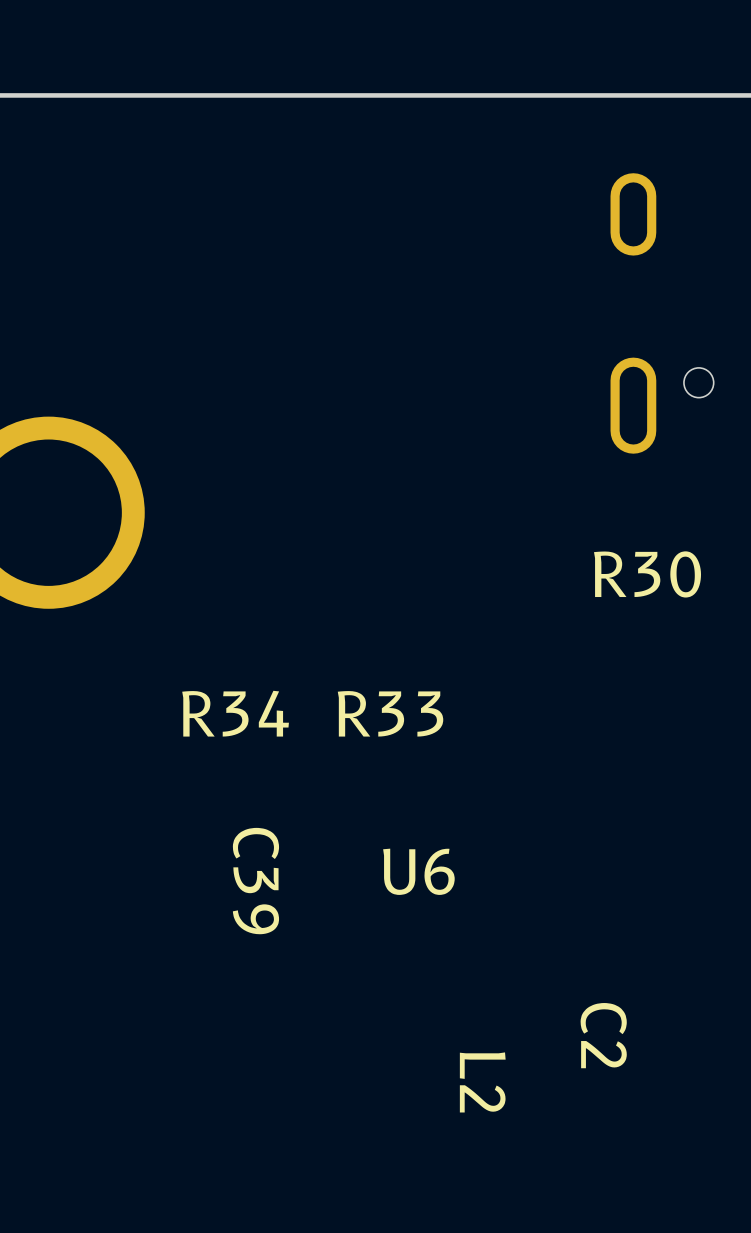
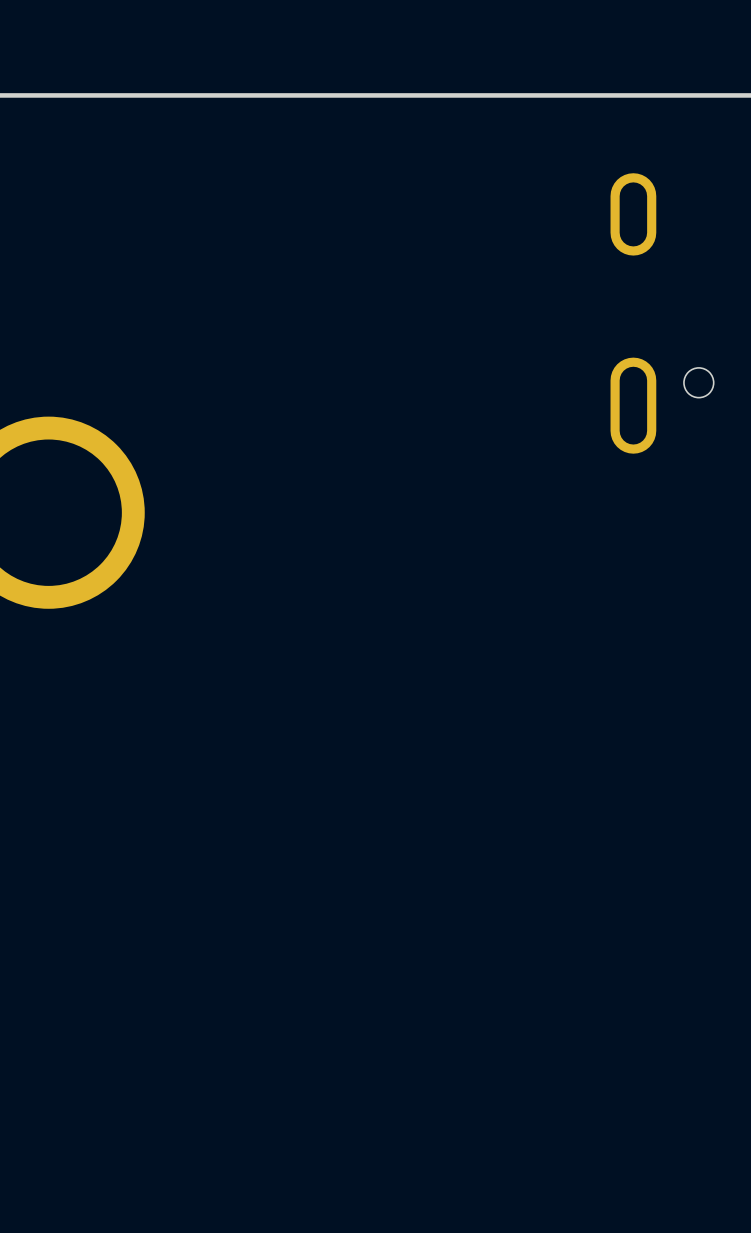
R30: (647, 574) -> none
R34: (235, 713) -> none
R33: (390, 713) -> none
U6: (418, 871) -> none
C39: (255, 881) -> none
C2: (603, 1035) -> none
L2: (482, 1082) -> none

